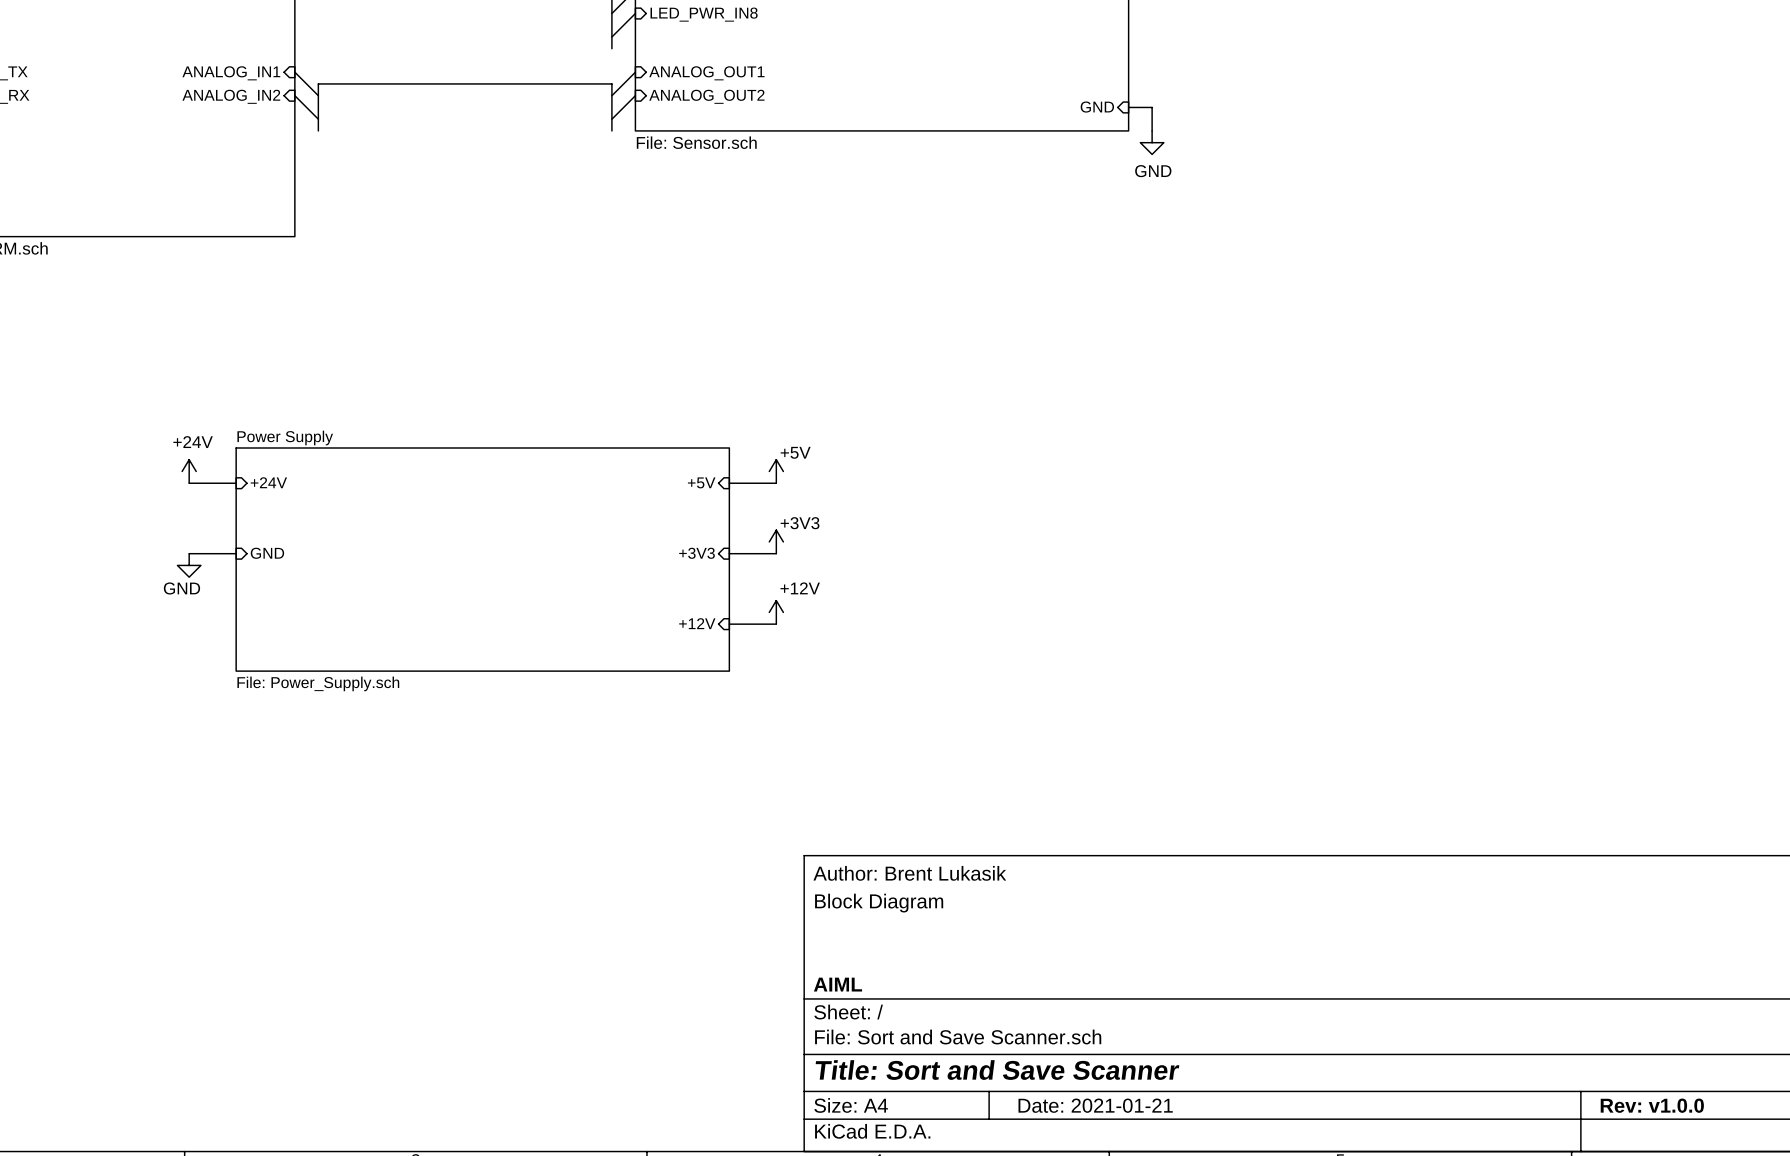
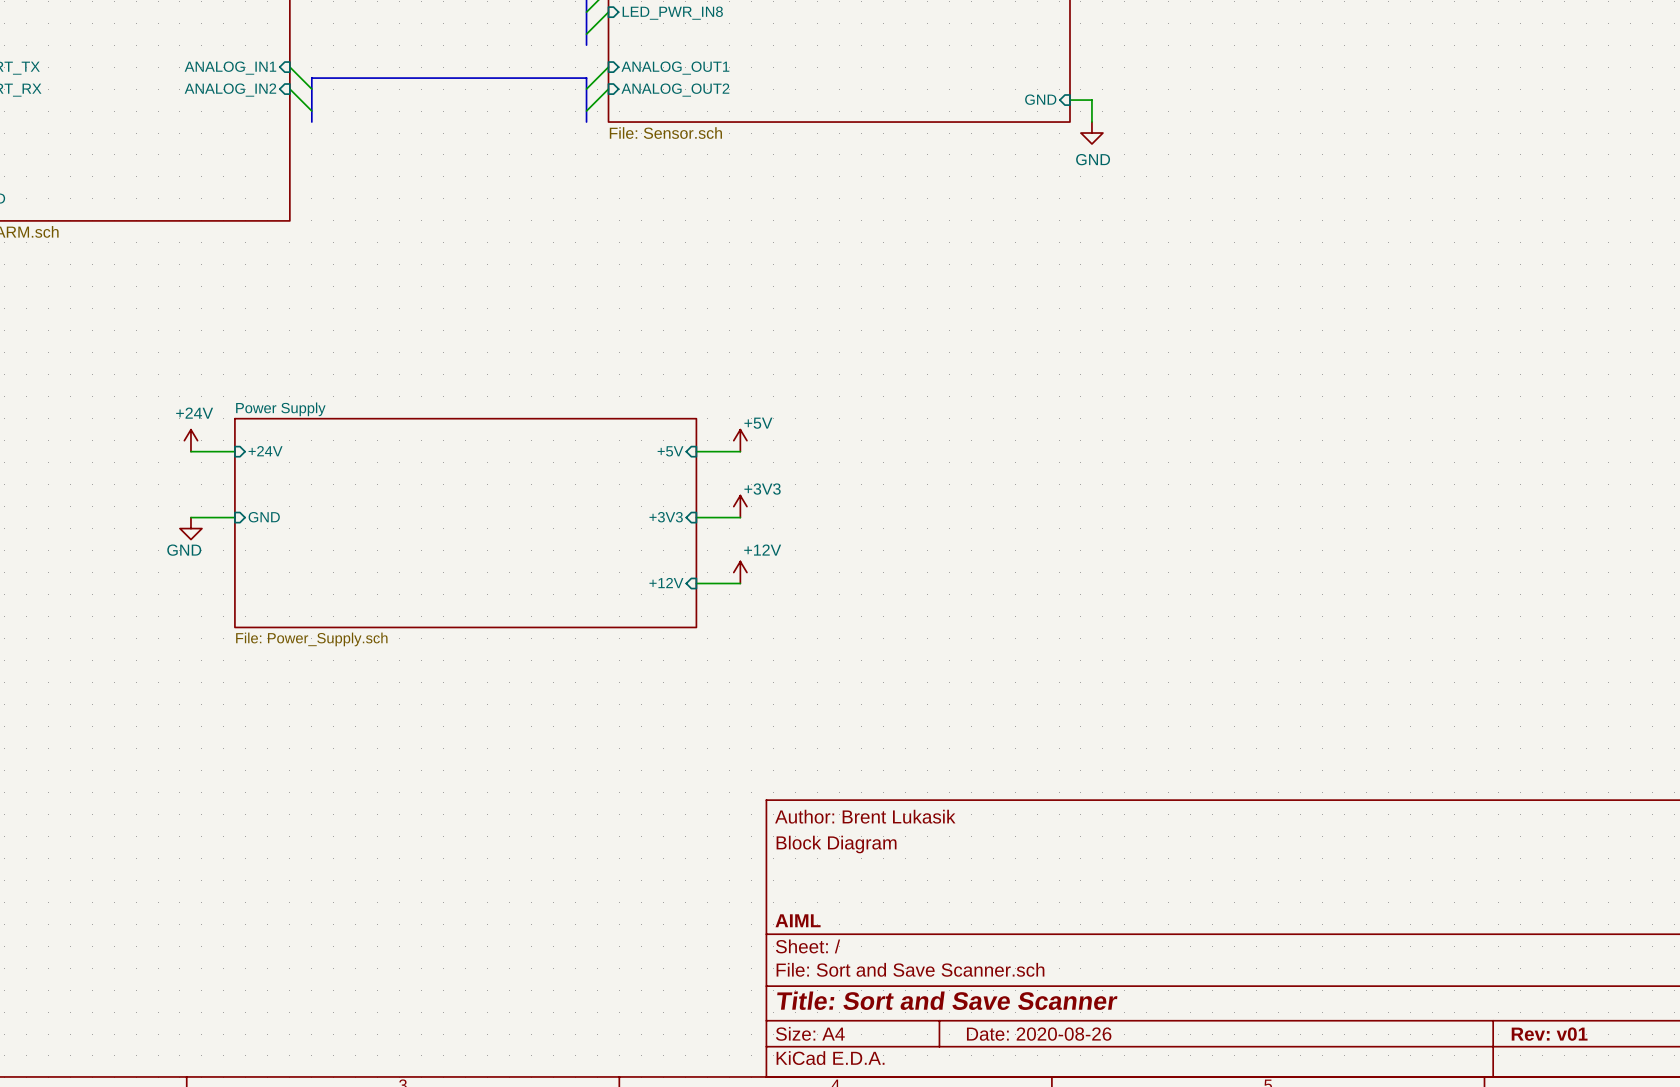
title block: Date: 2021-01-21 (1095, 1105) -> Date: 2020-08-26 (1039, 1034)
title block: Rev: v1.0.0 (1652, 1105) -> Rev: v01 (1549, 1034)

